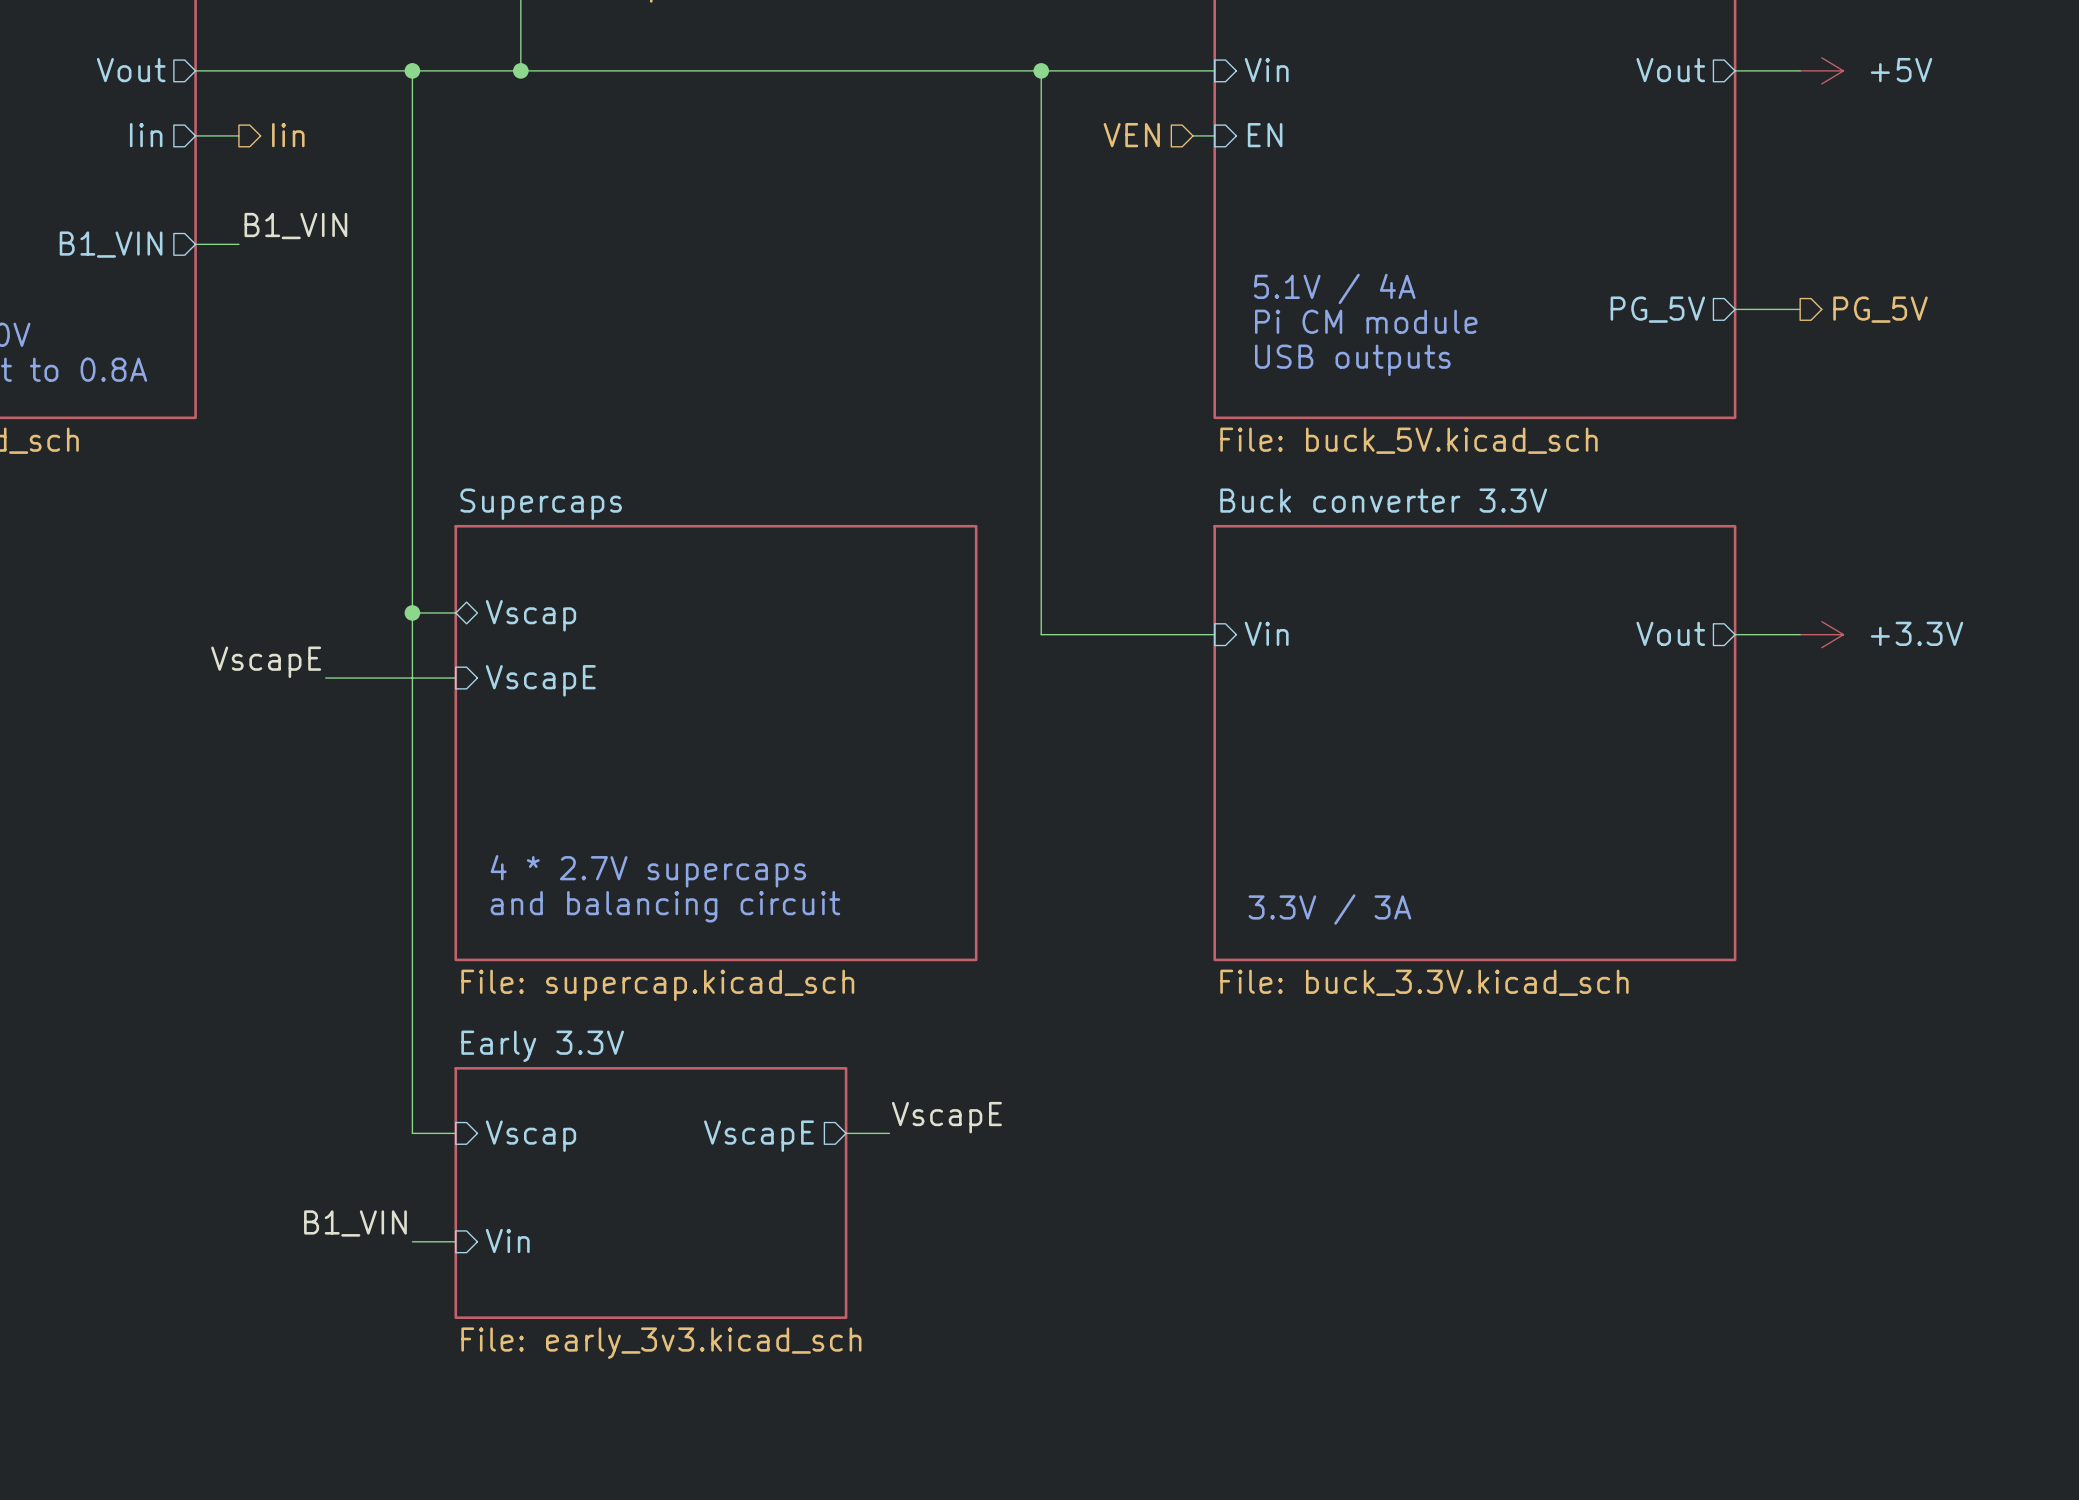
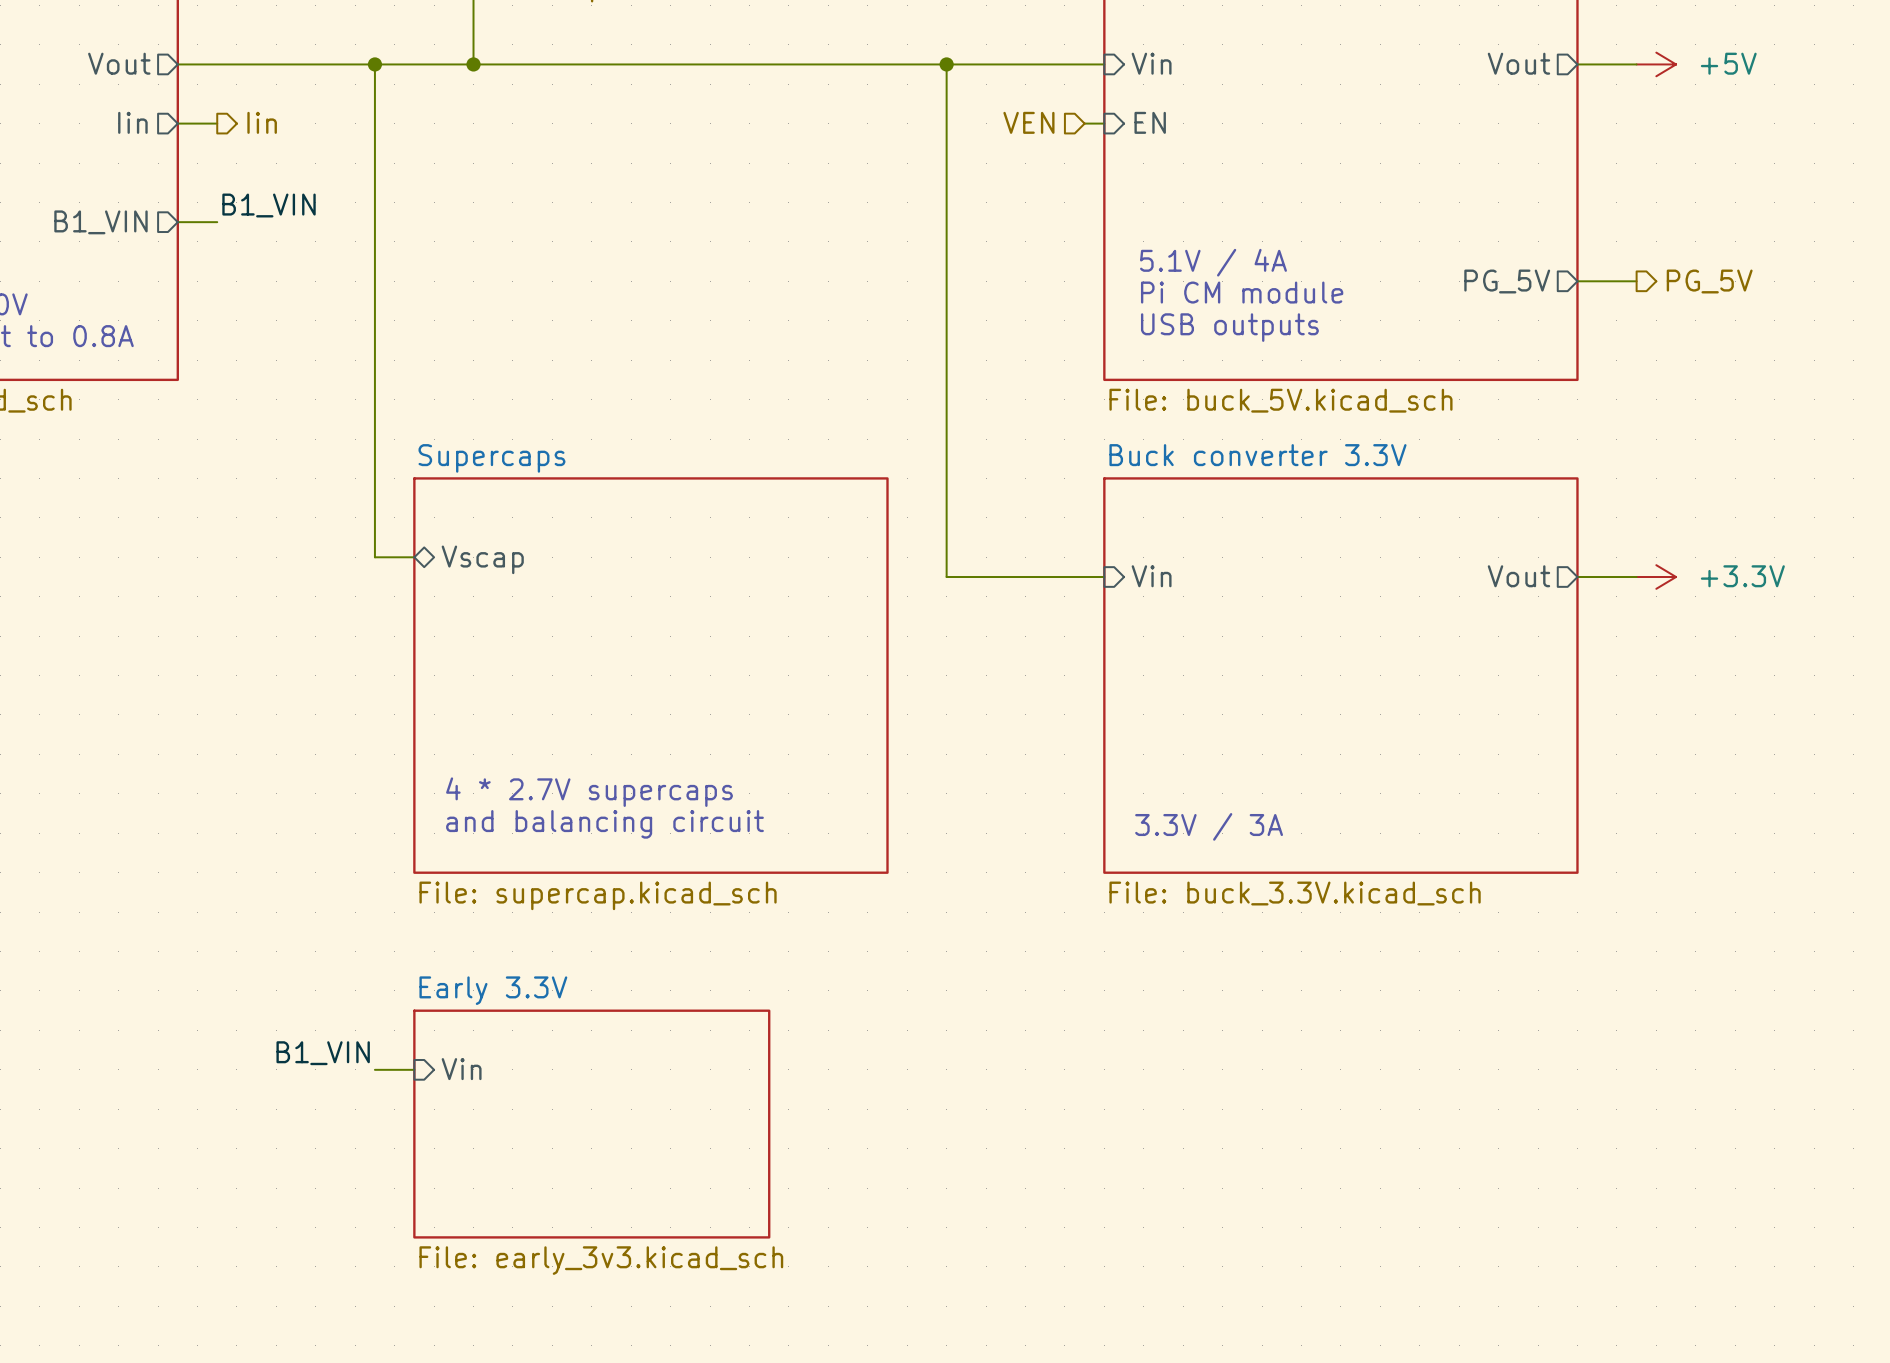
wire: (412, 612) (412, 1133) (455, 1133) -> none
junction: (412, 612) -> none
label: VscapE (266, 662) -> none
wire: (325, 678) (455, 678) -> none
sheet pin: VscapE (540, 680) -> none
label: VscapE (946, 1117) -> none
wire: (846, 1133) (889, 1133) -> none
sheet pin: Vscap (530, 1136) -> none
sheet pin: VscapE (759, 1136) -> none
sheet Early 3.3V position: (650, 1193) -> (591, 1124)
label position: B1_VIN (355, 1223) -> B1_VIN (323, 1053)
sheet pin position: Vin (507, 1240) -> Vin (461, 1069)
wire: (412, 1241) (455, 1241) -> (374, 1069) (414, 1069)

